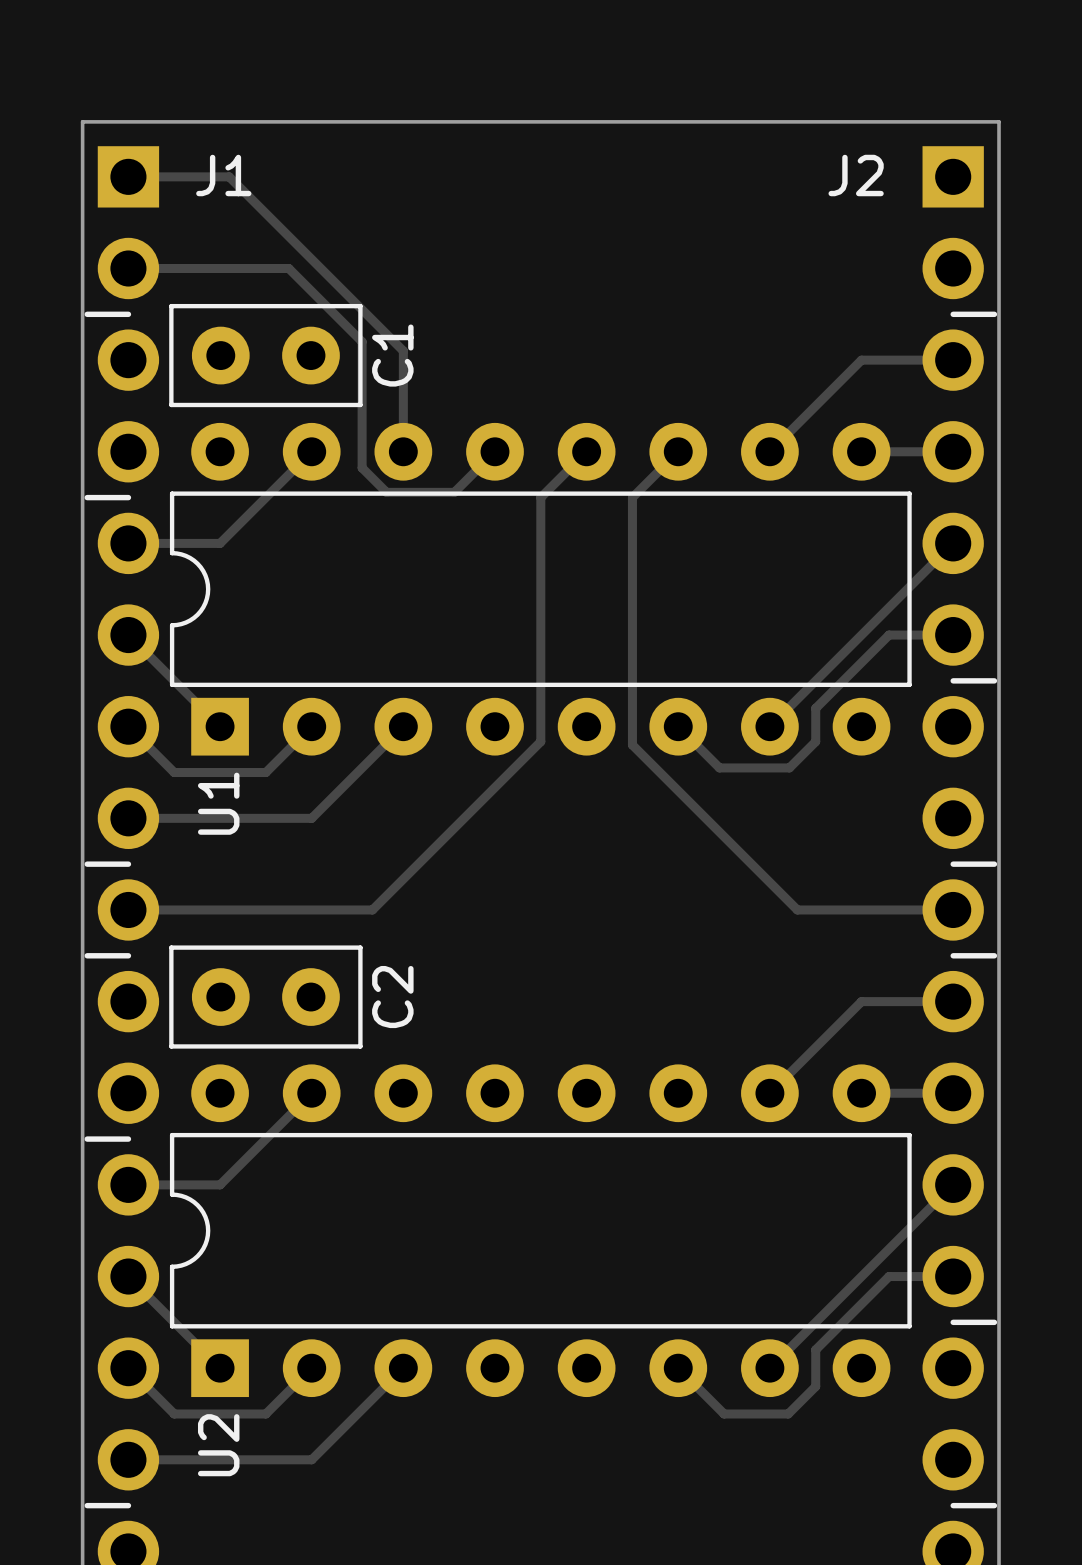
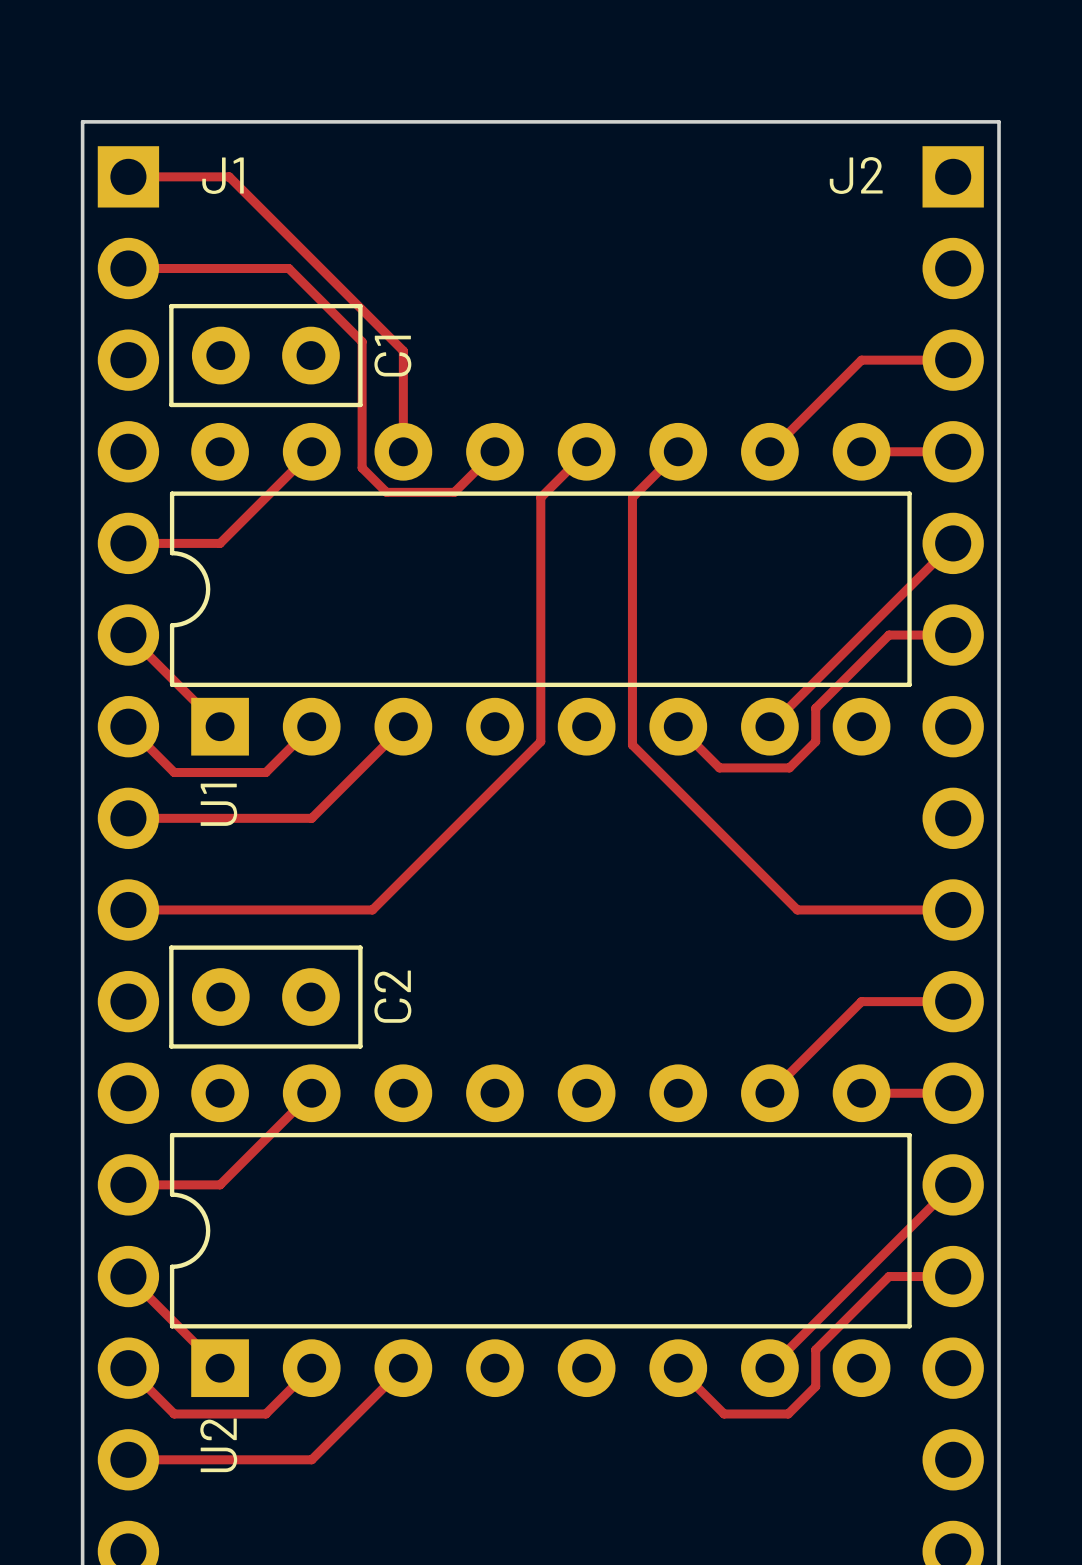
line: (87, 314) (128, 314) -> none
line: (953, 314) (994, 314) -> none
line: (87, 497) (128, 497) -> none
line: (953, 680) (994, 680) -> none
line: (87, 864) (128, 864) -> none
line: (953, 864) (994, 864) -> none
line: (87, 955) (128, 955) -> none
line: (953, 955) (994, 955) -> none
line: (87, 1139) (128, 1139) -> none
line: (953, 1322) (994, 1322) -> none
line: (87, 1505) (128, 1505) -> none
line: (953, 1505) (994, 1505) -> none

